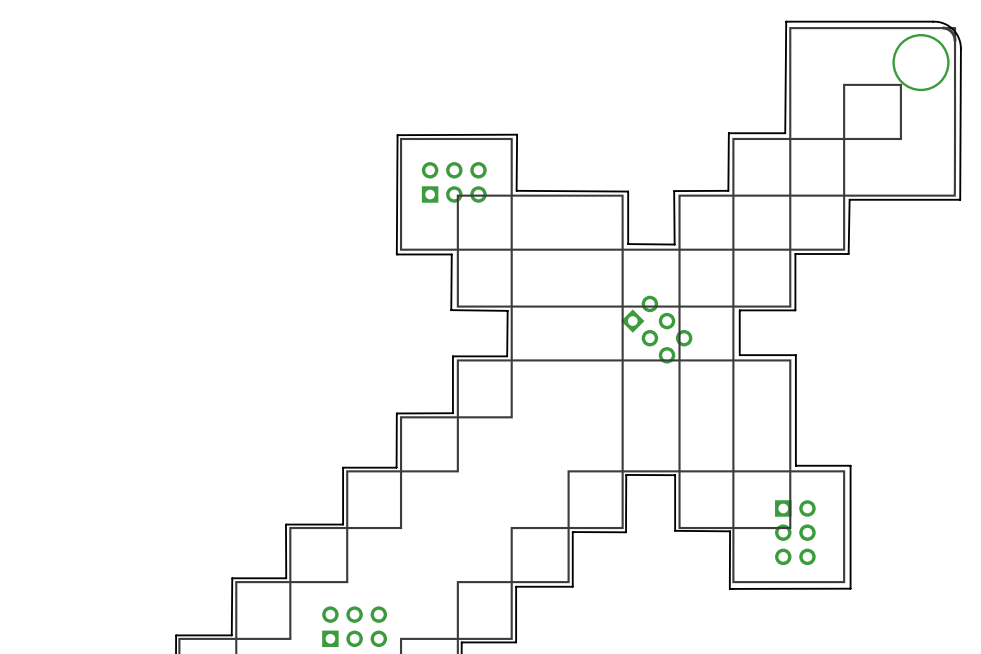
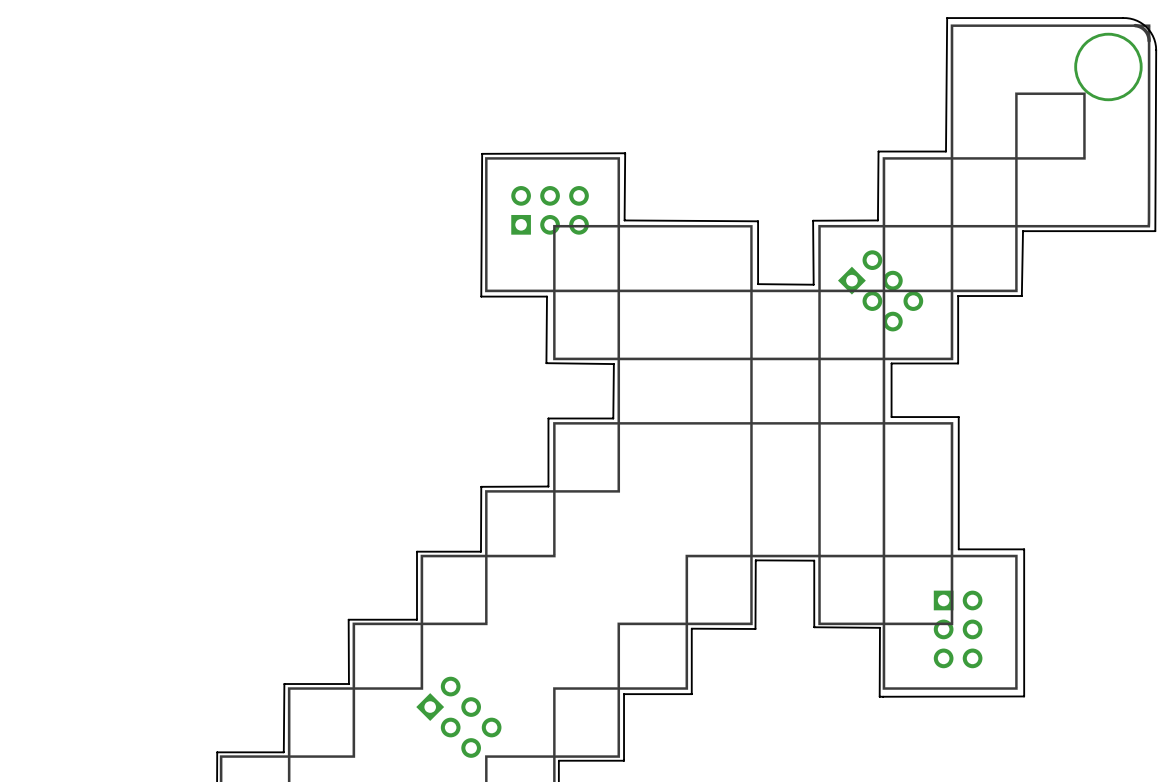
part position: (656, 329) -> (880, 290)
part: none -> (458, 717)
part: (354, 626) -> none

